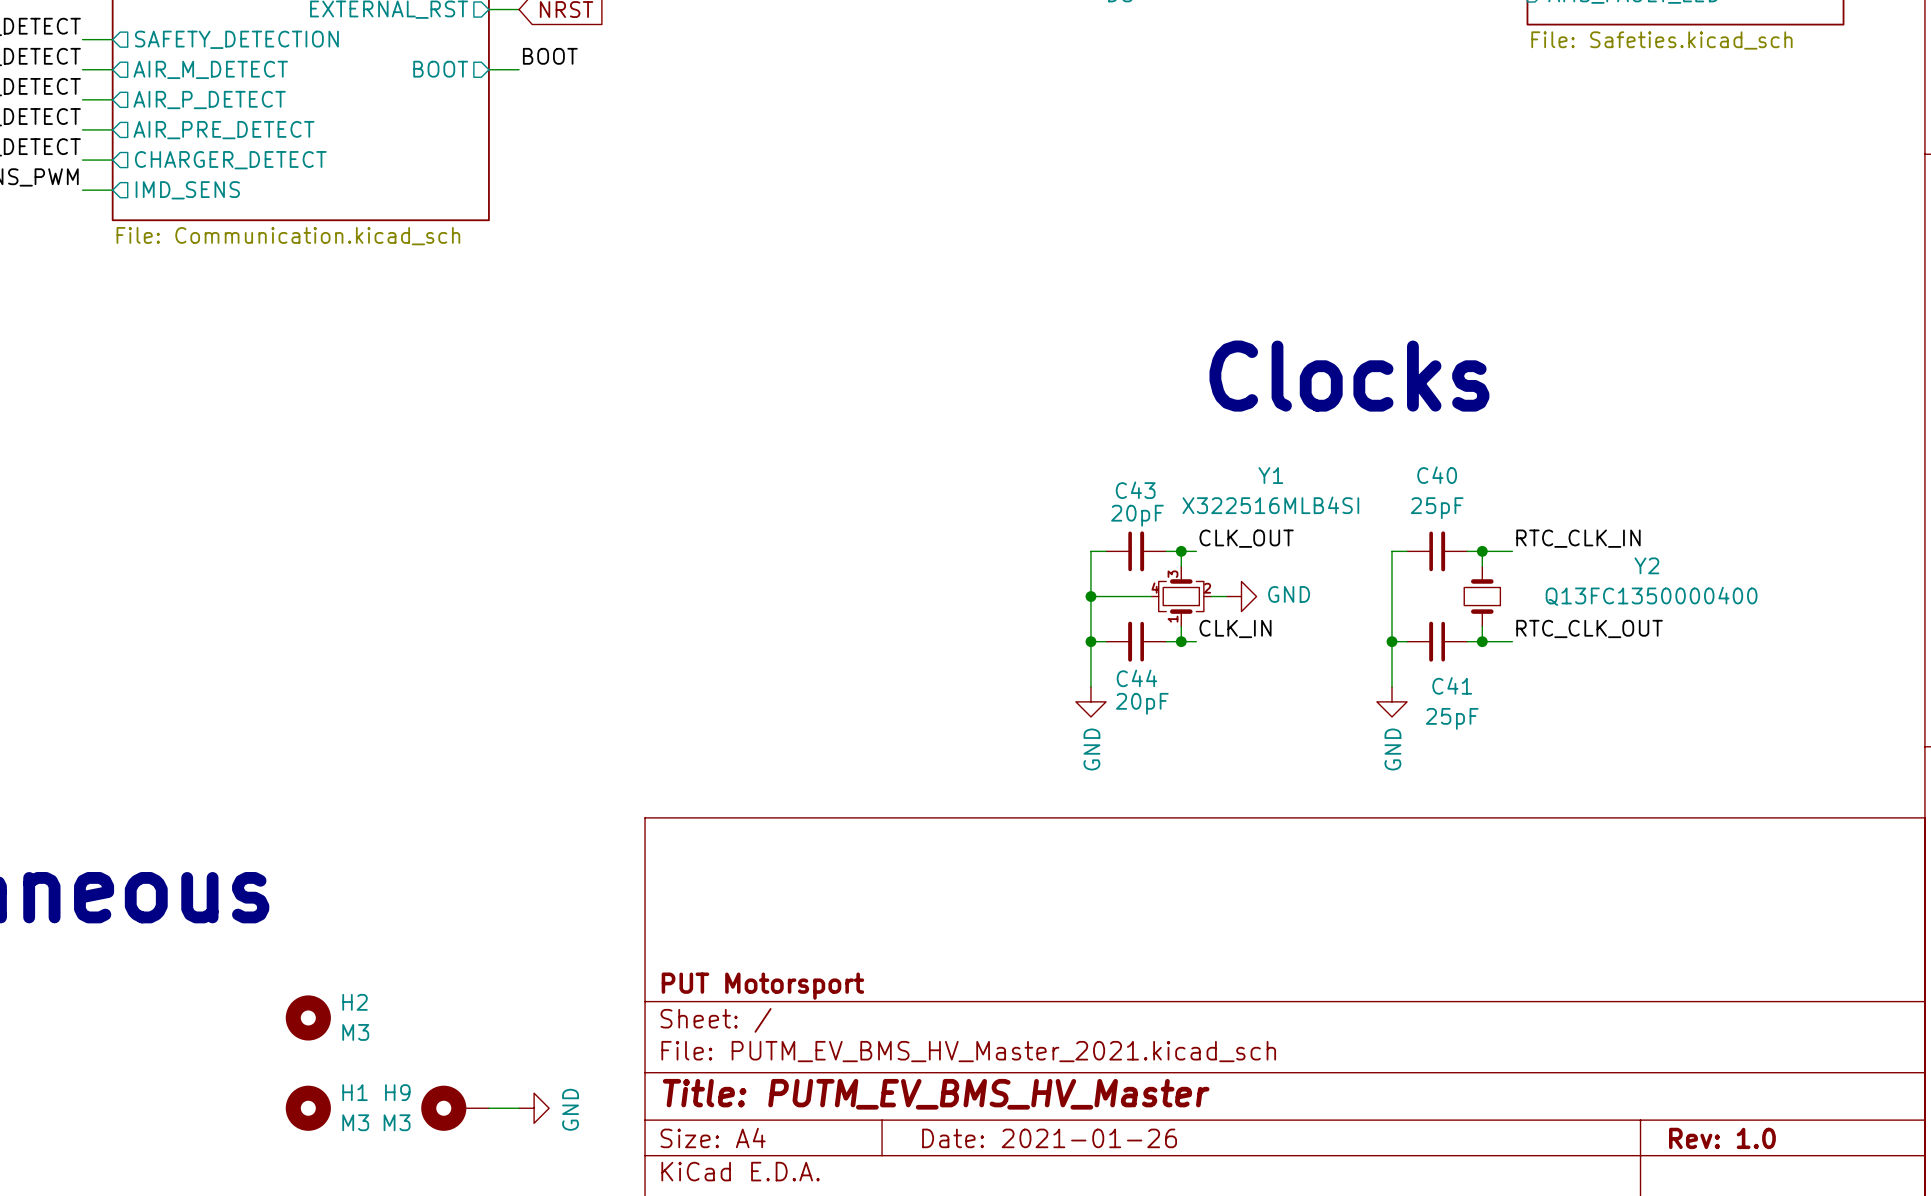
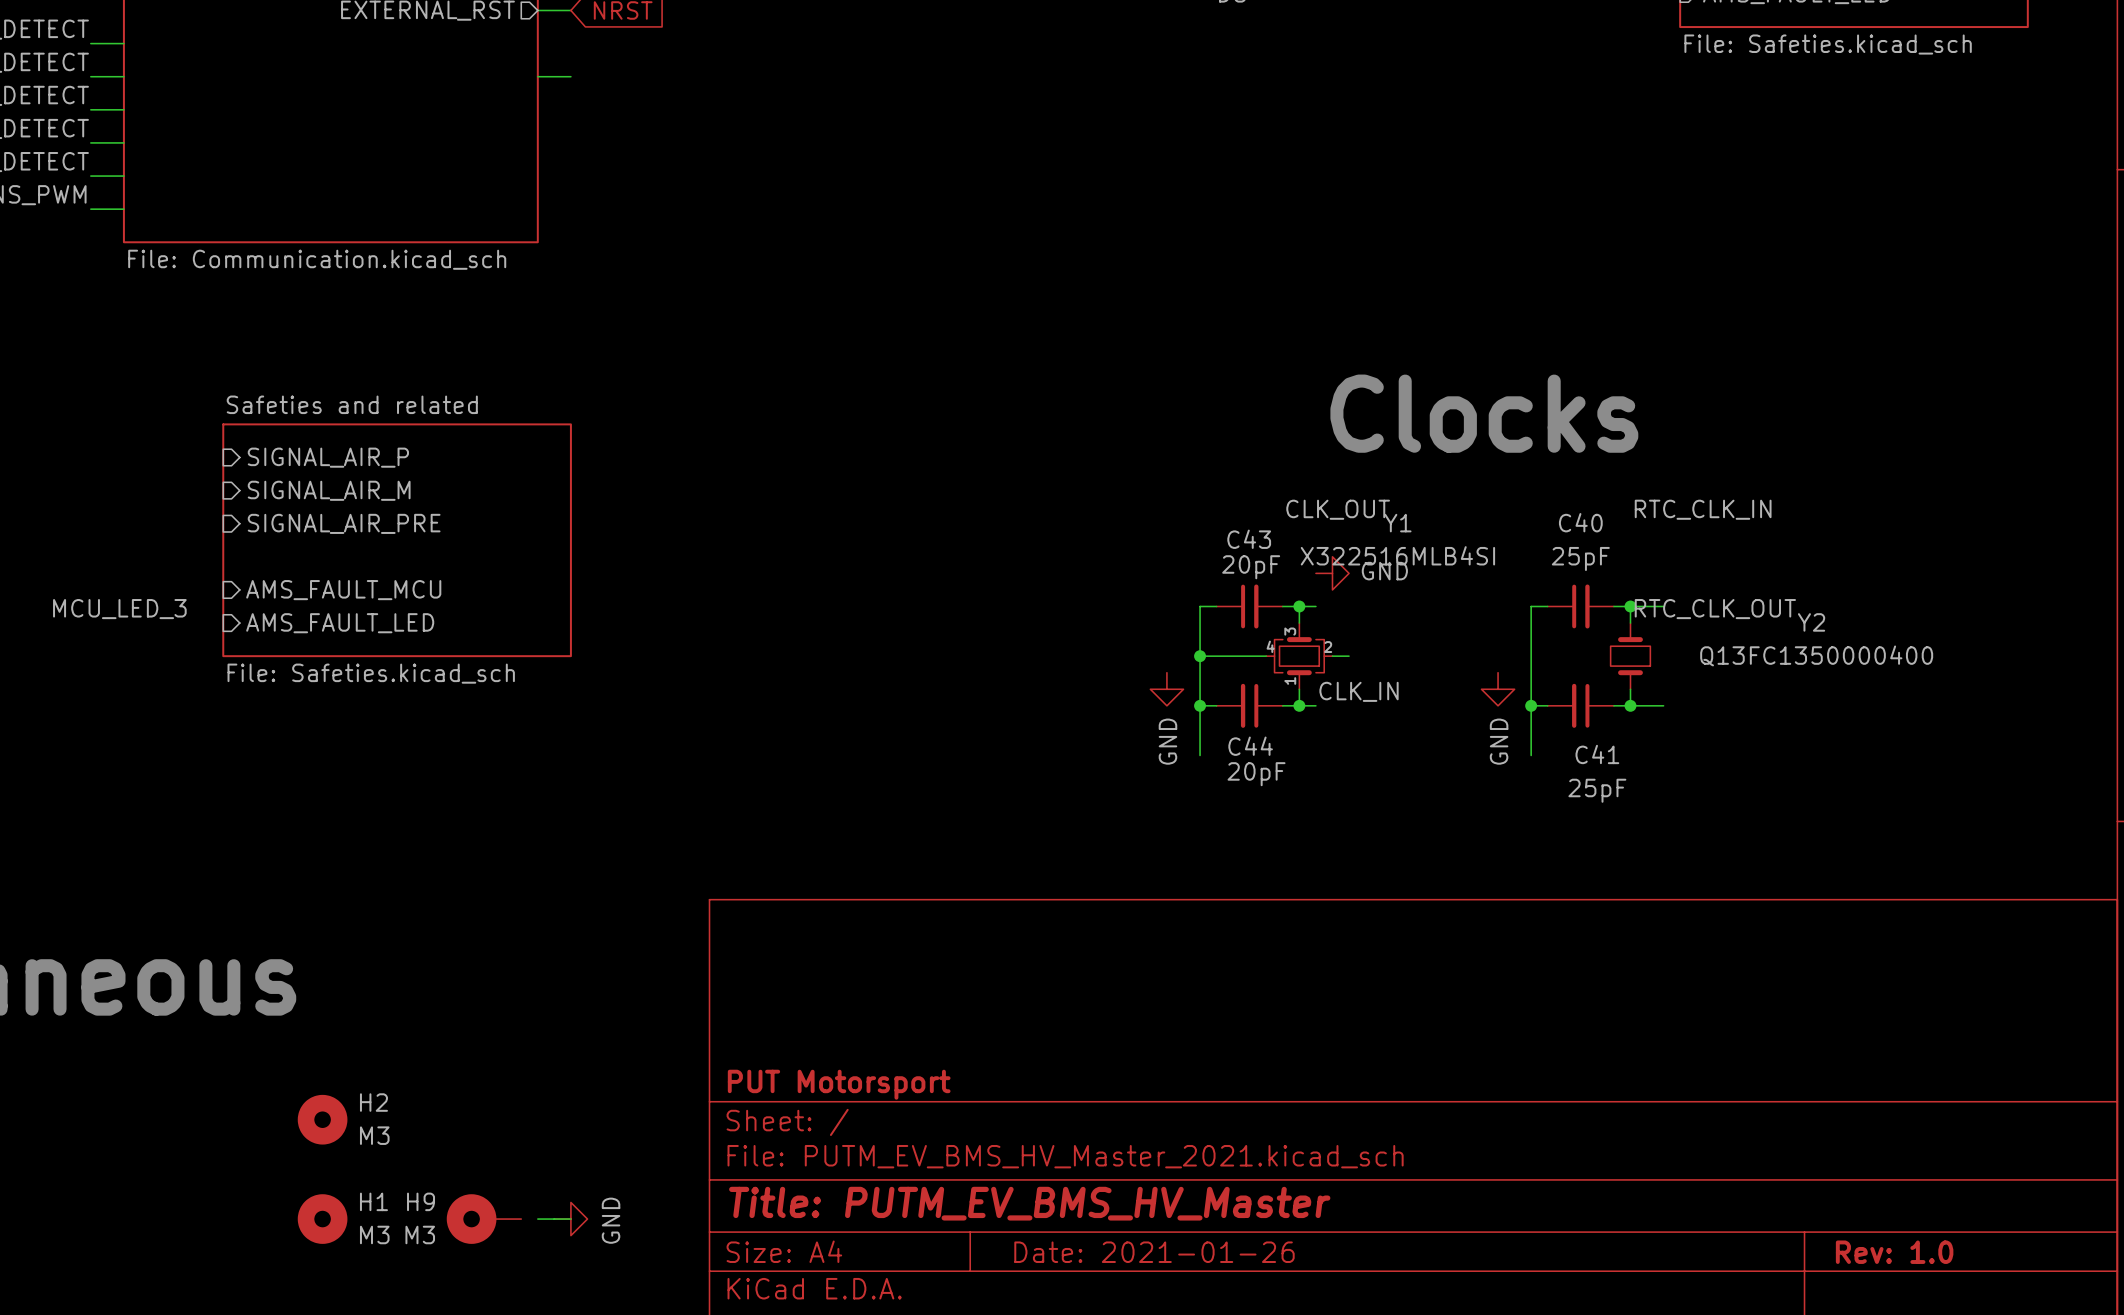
sheet pin: SAFETY_DETECTION (236, 39) -> none
label: BOOT (550, 56) -> none
sheet pin: AIR_M_DETECT (210, 69) -> none
sheet pin: BOOT (440, 69) -> none
sheet pin: AIR_P_DETECT (209, 100) -> none
sheet pin: AIR_PRE_DETECT (223, 130) -> none
sheet pin: CHARGER_DETECT (230, 160) -> none
sheet pin: IMD_SENS (187, 190) -> none
sheet pin: none -> SIGNAL_AIR_P (328, 457)
sheet pin: none -> SIGNAL_AIR_M (329, 490)
sheet pin: none -> SIGNAL_AIR_PRE (344, 523)
sheet Safeties and related: none -> File: Safeties.kicad_sch (397, 540)
power symbol: none -> GND (1332, 573)
sheet pin: none -> AMS_FAULT_MCU (343, 590)
label position: CLK_OUT (1246, 538) -> CLK_OUT (1338, 509)
label position: RTC_CLK_IN (1578, 538) -> RTC_CLK_IN (1703, 509)
label: none -> MCU_LED_3 (119, 609)
sheet pin: none -> AMS_FAULT_LED (340, 623)
power symbol: GND (1241, 596) -> none
power symbol: none -> GND (1498, 689)
label position: RTC_CLK_OUT (1589, 628) -> RTC_CLK_OUT (1715, 609)
power symbol position: GND (1090, 701) -> GND (1166, 689)
power symbol: GND (1392, 701) -> none
H2 position: (308, 1017) -> (322, 1119)
H1 position: (308, 1108) -> (322, 1219)
H9 position: (455, 1108) -> (484, 1219)
power symbol position: GND (534, 1108) -> GND (570, 1219)

